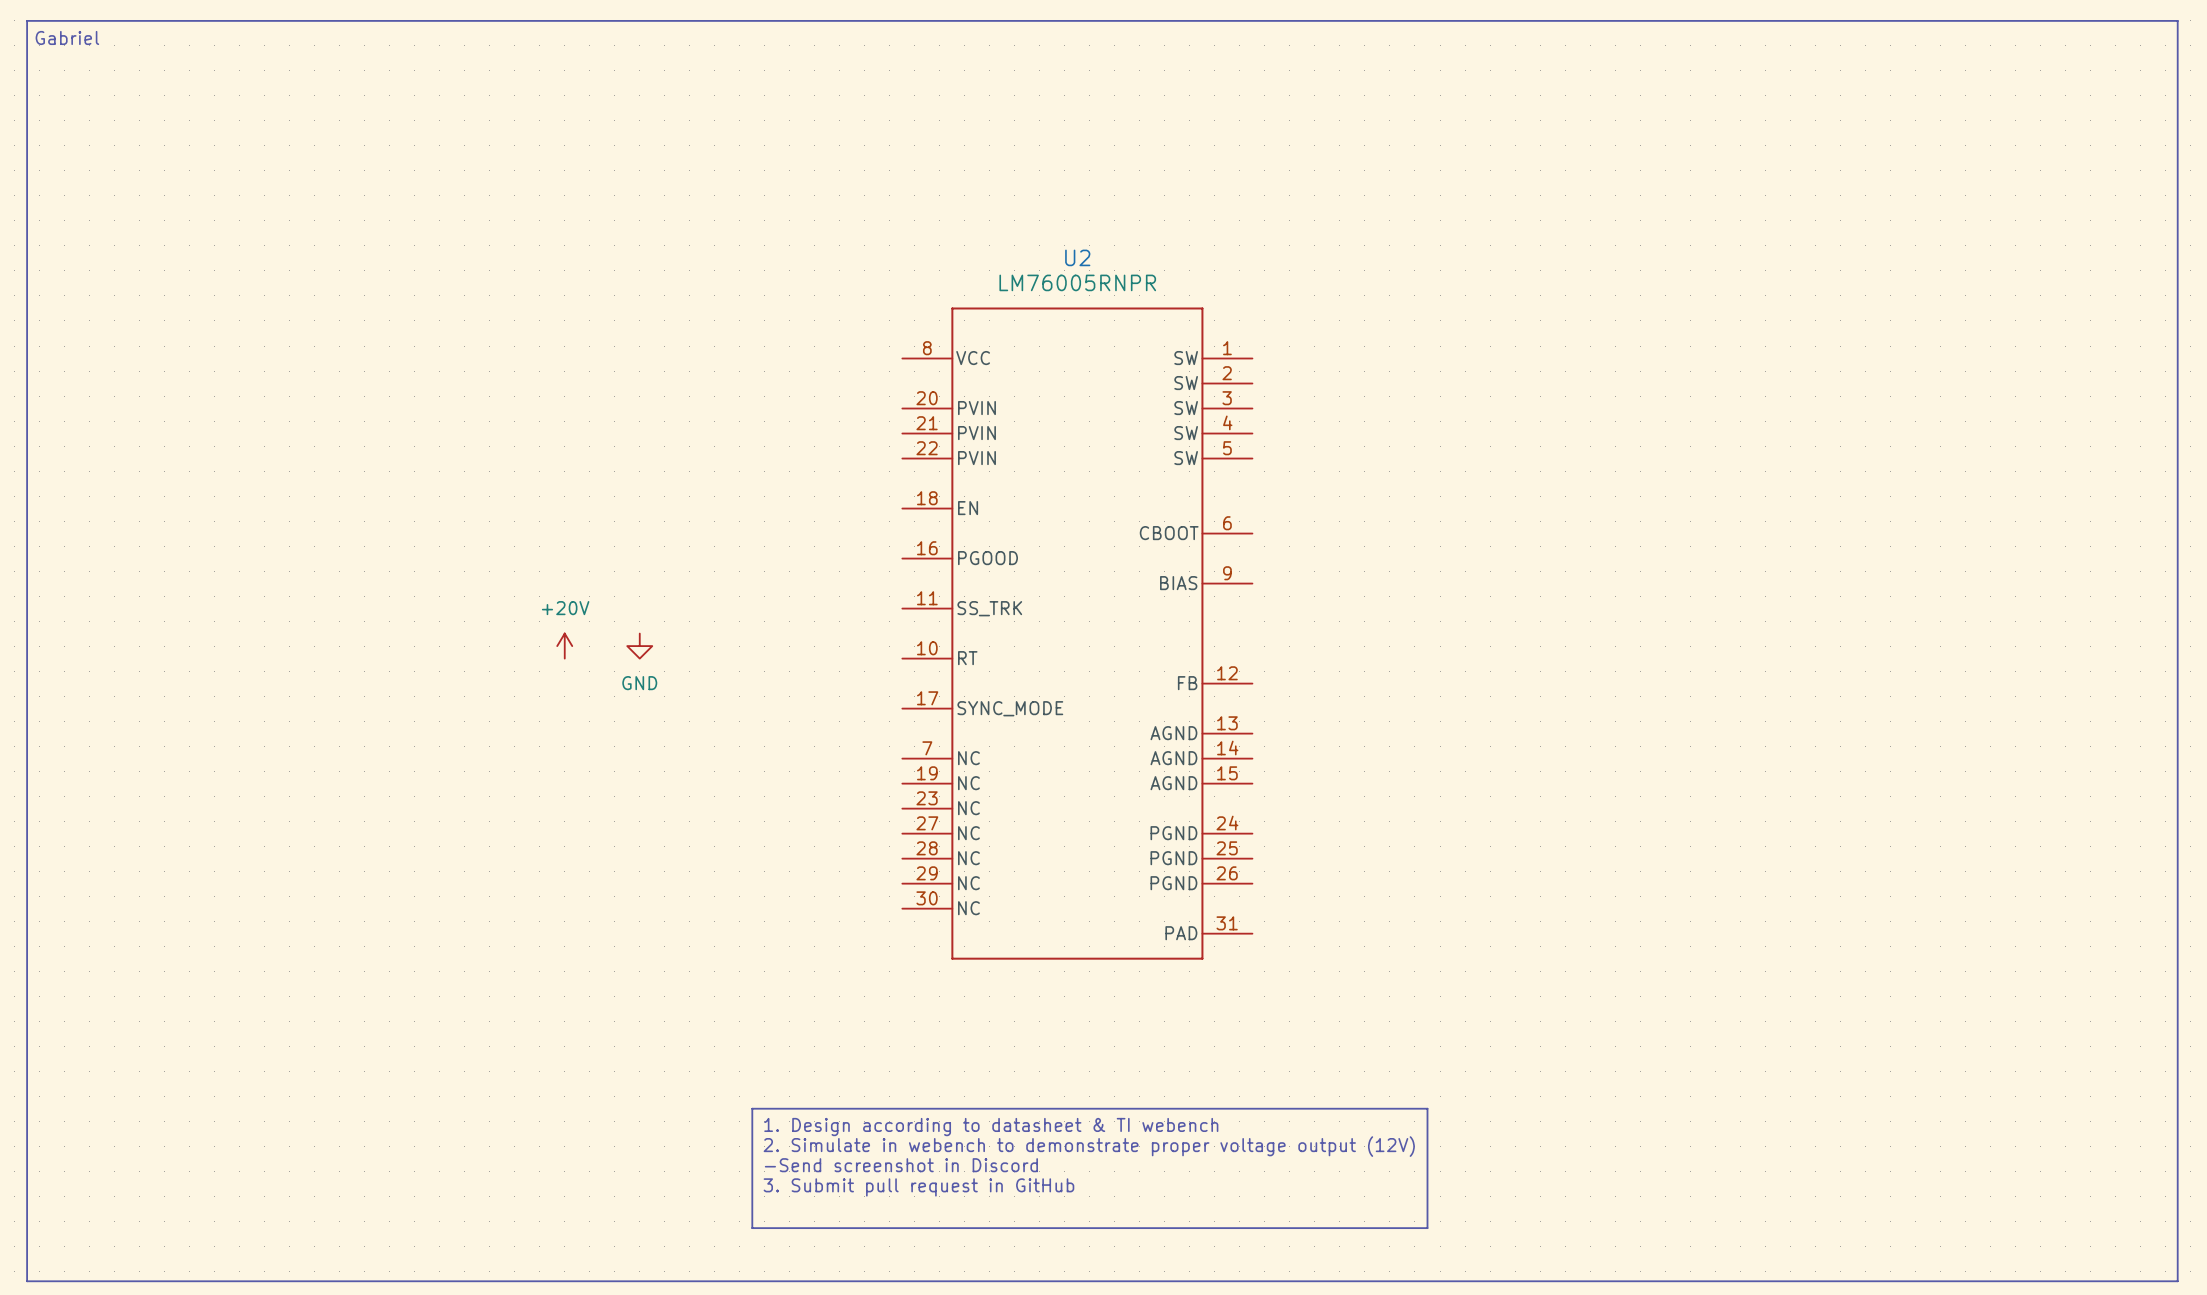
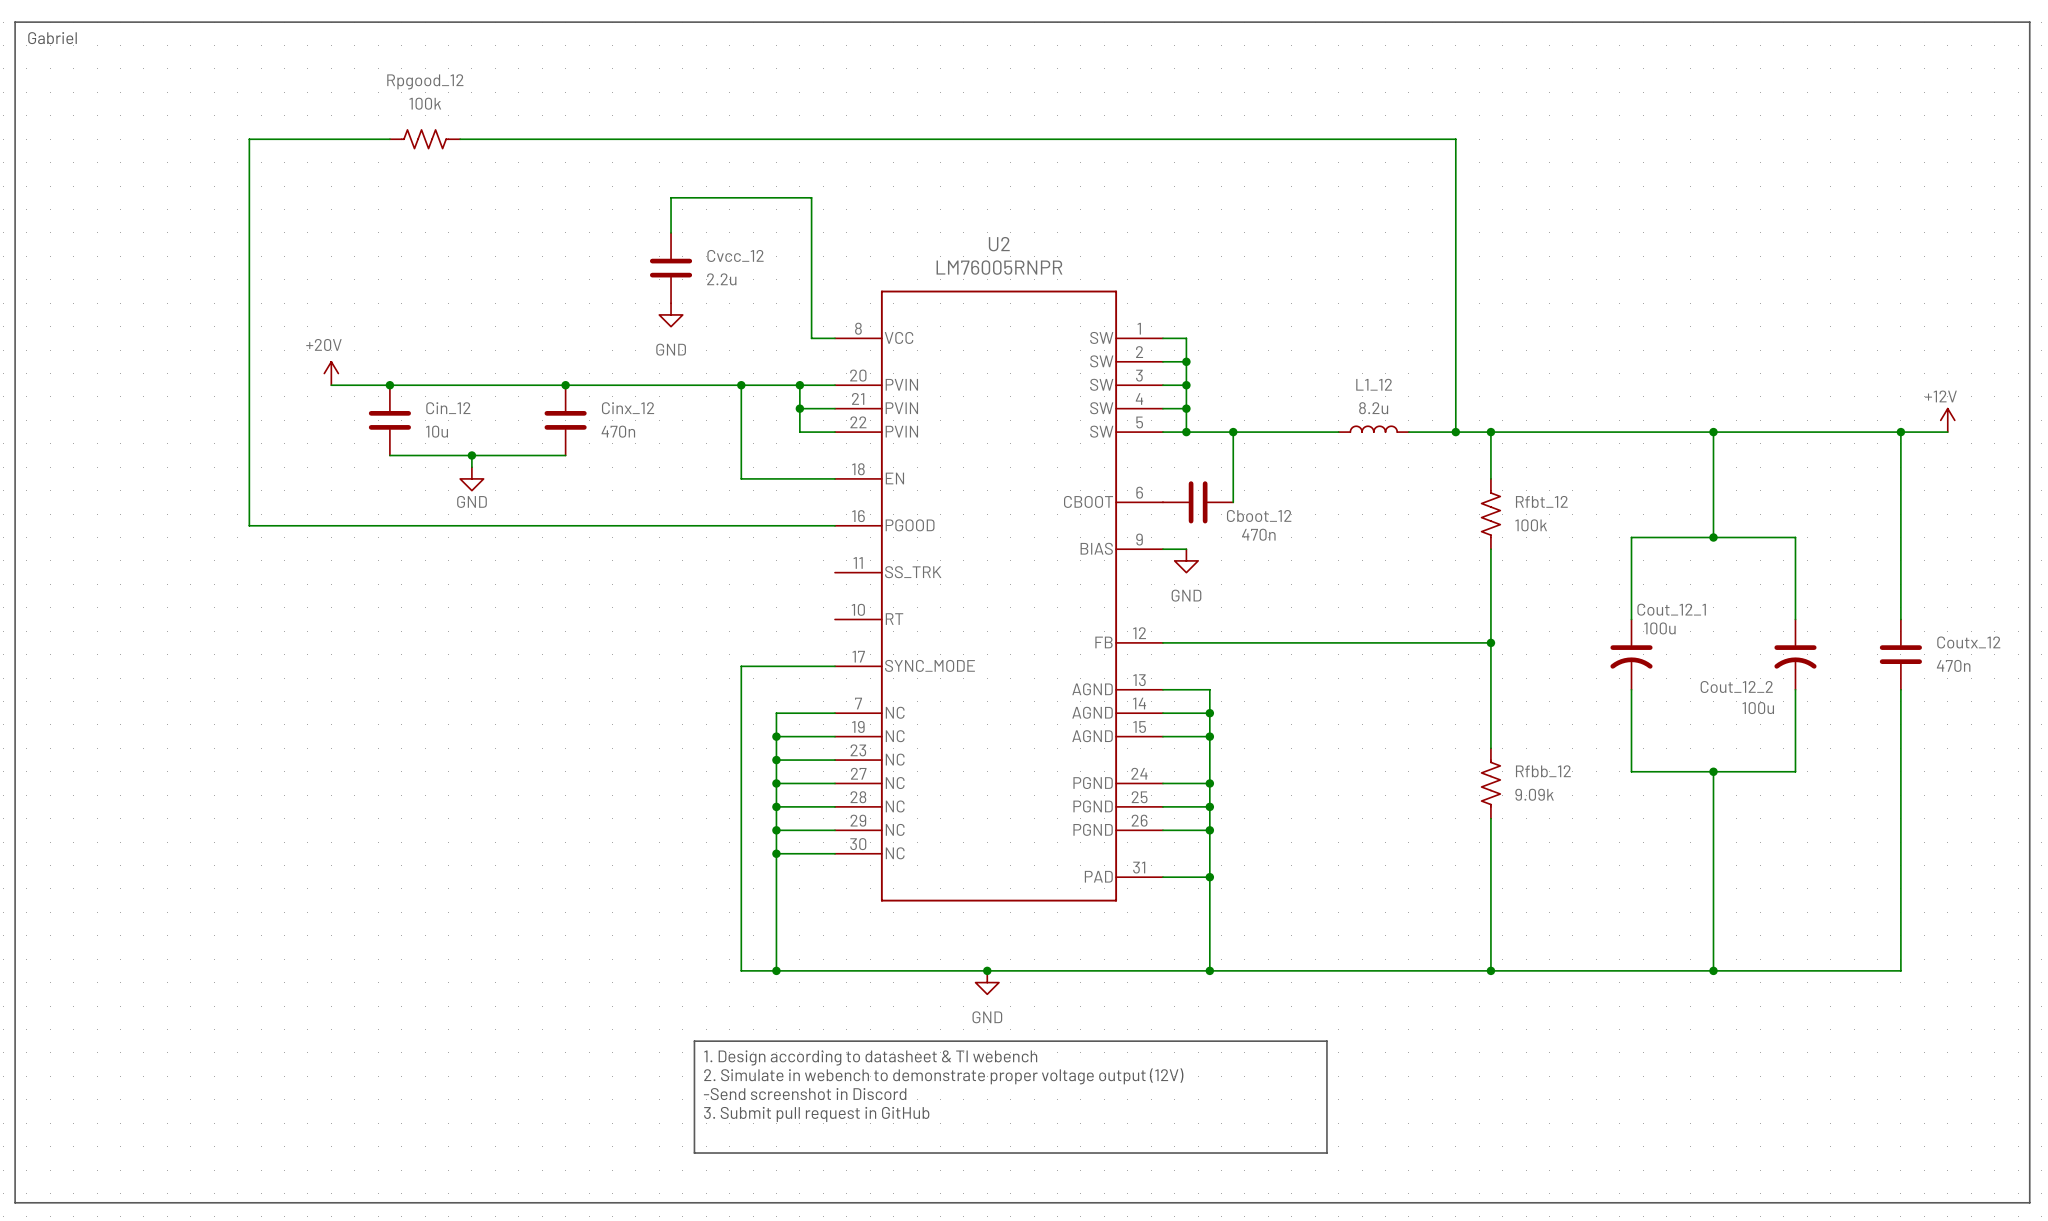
wire: none -> (389, 139) (249, 139) (249, 525) (835, 525)
Rpgood_12: none -> 100k (425, 139)
wire: none -> (460, 139) (1455, 139) (1455, 432)
wire: none -> (671, 232) (671, 197) (811, 197) (811, 338) (835, 338)
Cvcc_12: none -> 2.2u (671, 268)
power symbol: none -> GND (671, 314)
wire: none -> (1162, 338) (1186, 338) (1186, 432)
wire: none -> (1162, 361) (1186, 361)
junction: none -> (1186, 361)
power symbol: none -> +20V (331, 373)
wire: none -> (331, 385) (835, 385)
junction: none -> (389, 385)
junction: none -> (565, 385)
wire: none -> (741, 385) (741, 478) (835, 478)
junction: none -> (741, 385)
wire: none -> (799, 385) (799, 432) (835, 432)
junction: none -> (799, 385)
wire: none -> (1162, 385) (1186, 385)
junction: none -> (1186, 385)
wire: none -> (799, 408) (835, 408)
junction: none -> (799, 408)
wire: none -> (1162, 408) (1186, 408)
junction: none -> (1186, 408)
Cin_12: none -> 10u (389, 420)
Cinx_12: none -> 470n (565, 420)
power symbol: none -> +12V (1947, 420)
L1_12: none -> 8.2u (1373, 429)
wire: none -> (1162, 432) (1338, 432)
junction: none -> (1186, 432)
wire: none -> (1233, 432) (1233, 502)
junction: none -> (1233, 432)
wire: none -> (1408, 432) (1947, 432)
junction: none -> (1455, 432)
wire: none -> (1490, 432) (1490, 478)
junction: none -> (1490, 432)
wire: none -> (1713, 432) (1713, 537)
junction: none -> (1713, 432)
wire: none -> (1900, 432) (1900, 619)
junction: none -> (1900, 432)
wire: none -> (389, 455) (565, 455)
wire: none -> (471, 455) (471, 467)
junction: none -> (471, 455)
power symbol: none -> GND (471, 478)
Cboot_12: none -> 470n (1198, 502)
Rfbt_12: none -> 100k (1490, 514)
junction: none -> (1713, 537)
wire: none -> (1162, 549) (1186, 549)
wire: none -> (1490, 549) (1490, 748)
power symbol: none -> GND (1186, 560)
power symbol: +20V (564, 646) -> none
power symbol: GND (639, 646) -> none
wire: none -> (1631, 619) (1631, 537) (1795, 537) (1795, 619)
wire: none -> (1162, 642) (1490, 642)
junction: none -> (1490, 642)
Cout_12_1: none -> 100u (1631, 654)
Cout_12_2: none -> 100u (1795, 654)
Coutx_12: none -> 470n (1900, 654)
wire: none -> (835, 666) (741, 666) (741, 970) (1900, 970) (1900, 689)
wire: none -> (1162, 689) (1209, 689) (1209, 970)
wire: none -> (1631, 689) (1631, 771) (1795, 771) (1795, 689)
wire: none -> (835, 713) (776, 713) (776, 970)
wire: none -> (1162, 713) (1209, 713)
junction: none -> (1209, 713)
wire: none -> (776, 736) (835, 736)
junction: none -> (776, 736)
wire: none -> (1162, 736) (1209, 736)
junction: none -> (1209, 736)
wire: none -> (776, 760) (835, 760)
junction: none -> (776, 760)
wire: none -> (1713, 771) (1713, 970)
junction: none -> (1713, 771)
wire: none -> (776, 783) (835, 783)
junction: none -> (776, 783)
wire: none -> (1162, 783) (1209, 783)
junction: none -> (1209, 783)
Rfbb_12: none -> 9.09k (1490, 783)
wire: none -> (776, 806) (835, 806)
junction: none -> (776, 806)
wire: none -> (1162, 806) (1209, 806)
junction: none -> (1209, 806)
wire: none -> (1490, 818) (1490, 970)
wire: none -> (776, 830) (835, 830)
junction: none -> (776, 830)
wire: none -> (1162, 830) (1209, 830)
junction: none -> (1209, 830)
wire: none -> (776, 853) (835, 853)
junction: none -> (776, 853)
wire: none -> (1162, 877) (1209, 877)
junction: none -> (1209, 877)
junction: none -> (776, 970)
junction: none -> (987, 970)
junction: none -> (1209, 970)
junction: none -> (1490, 970)
junction: none -> (1713, 970)
power symbol: none -> GND (987, 982)

